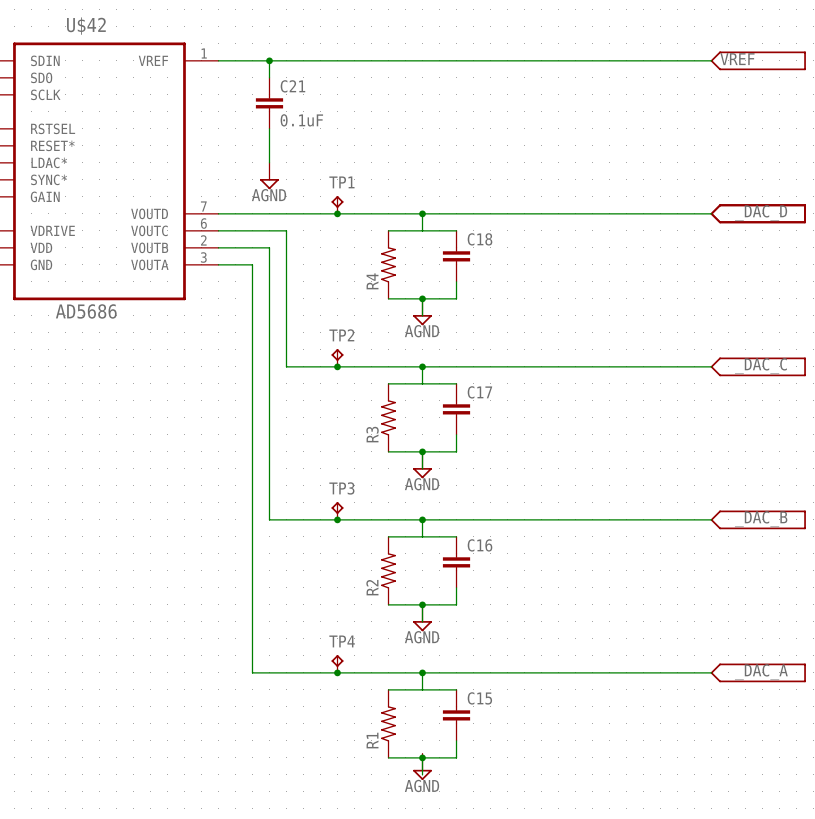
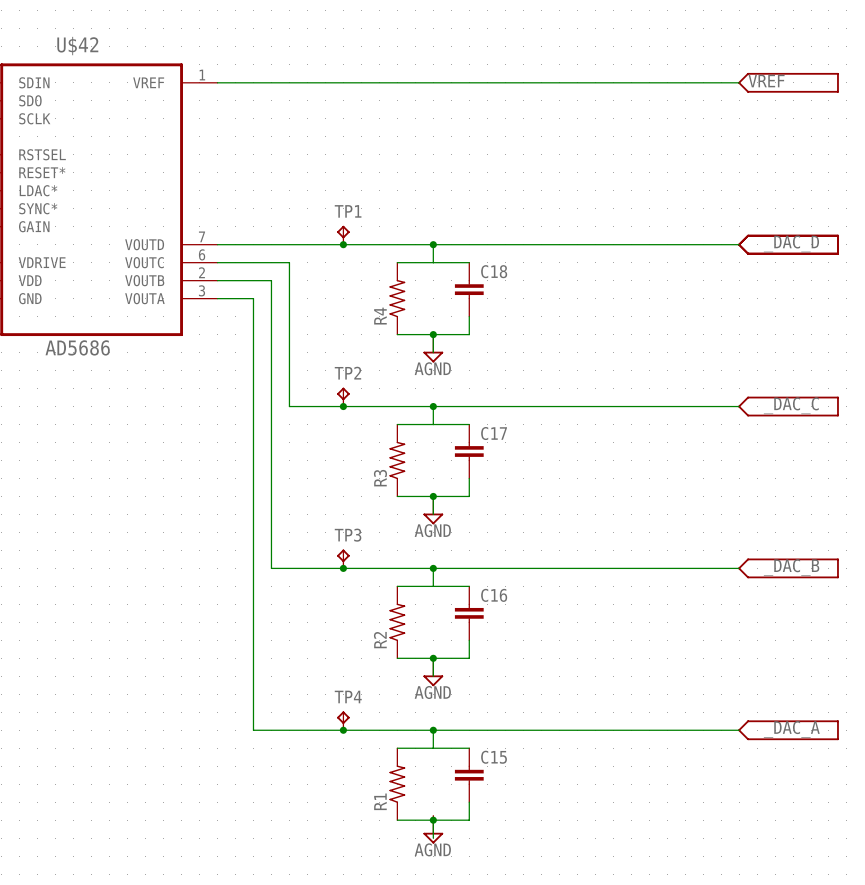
wire: (269, 60) (269, 77) -> none
junction: (269, 60) -> none
C21: 0.1uF (269, 103) -> none
wire: (269, 128) (269, 162) -> none
power symbol: AGND (269, 176) -> none

